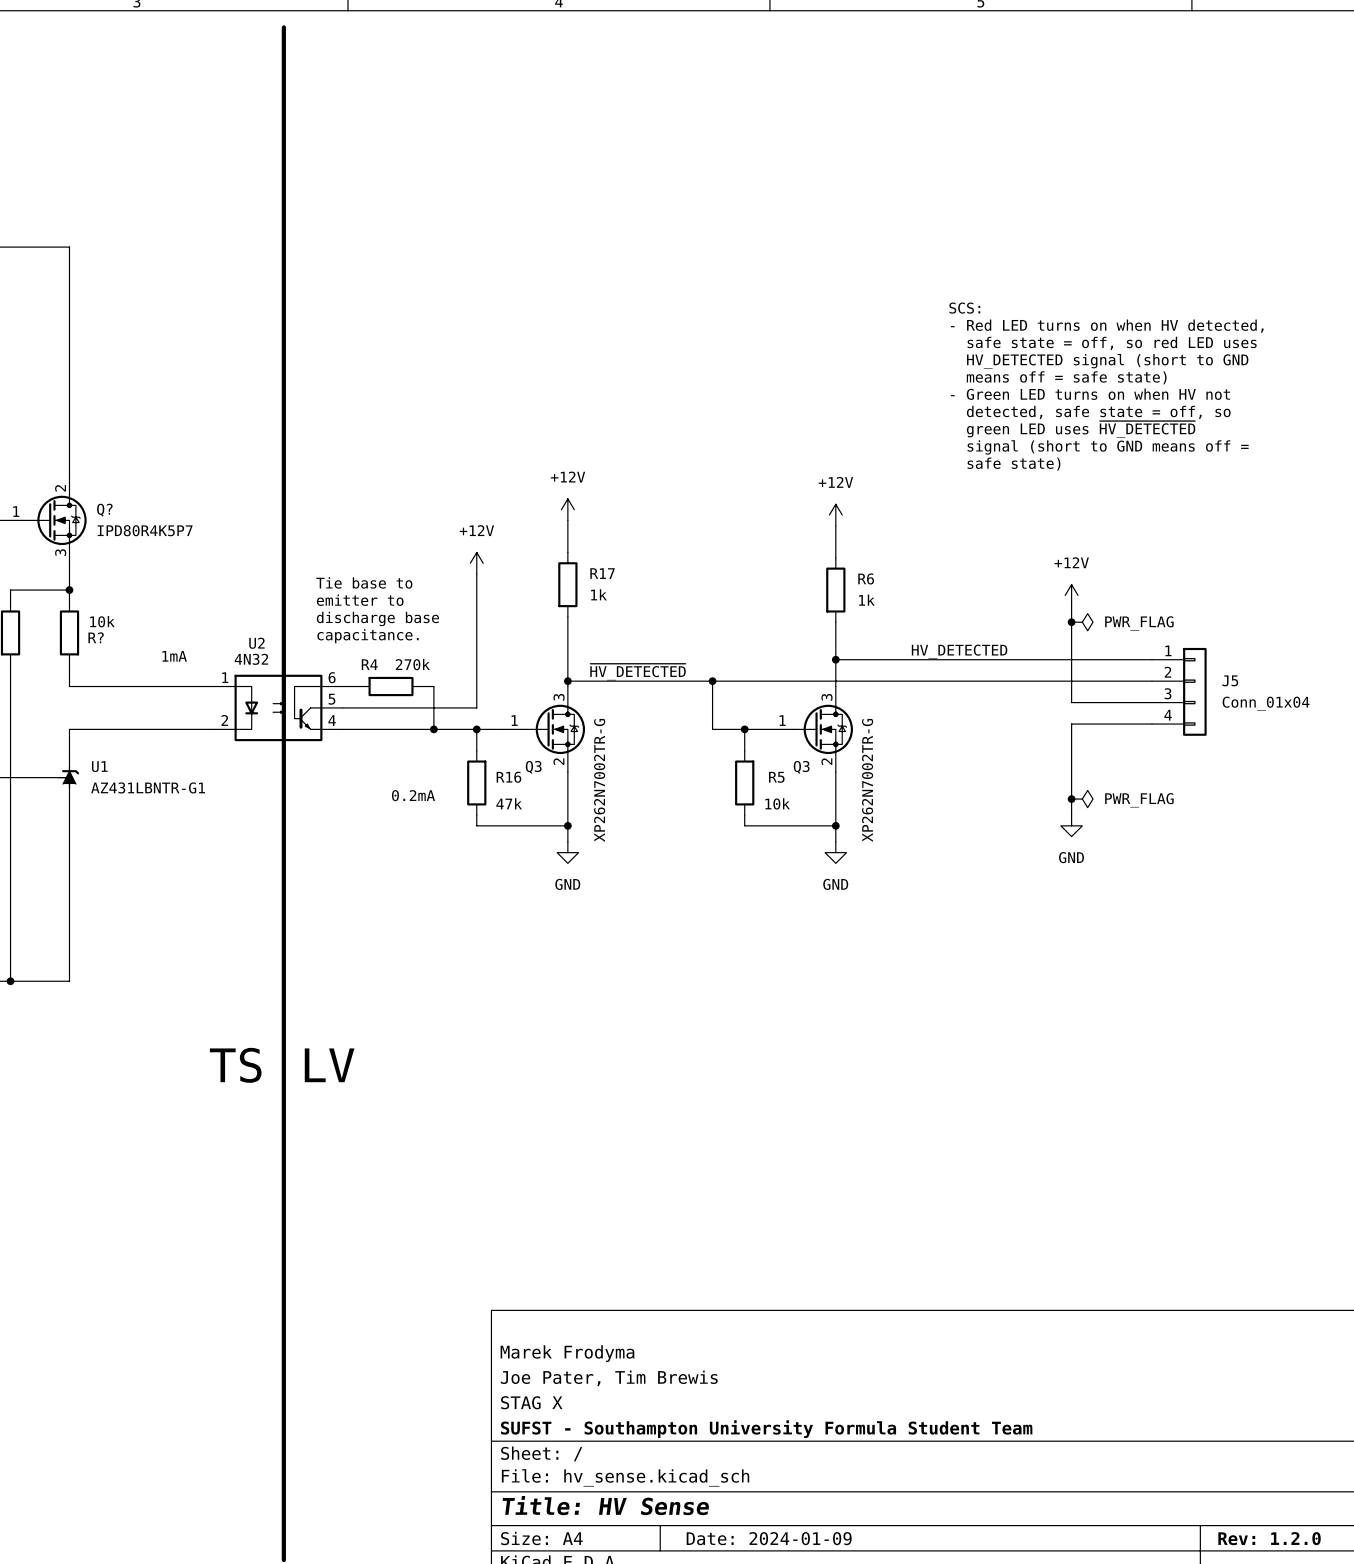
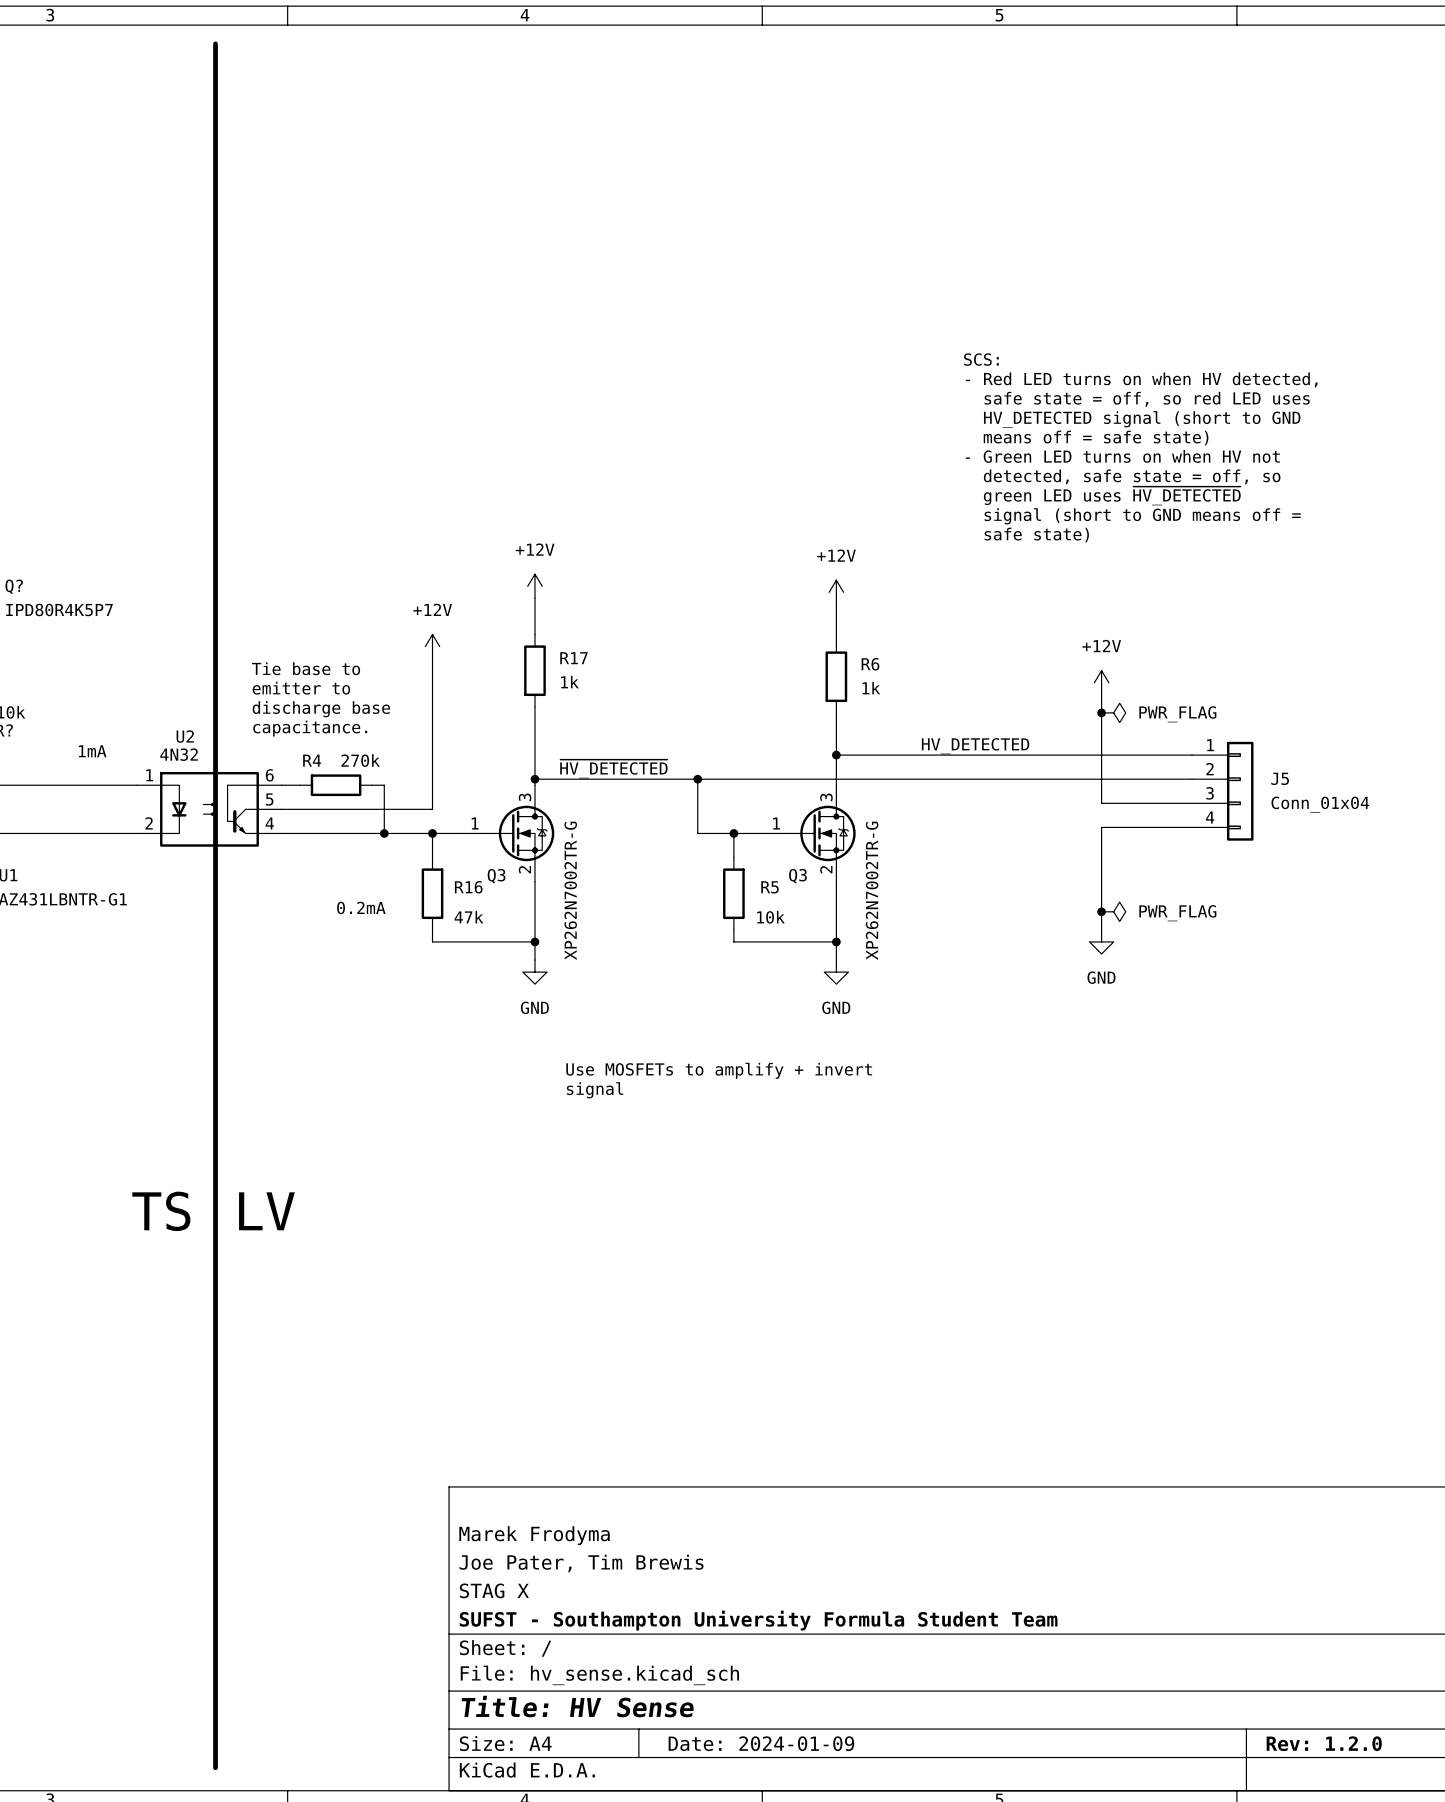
text: none -> Use MOSFETs to amplify + invert (719, 1070)
text: none -> signal (595, 1090)

